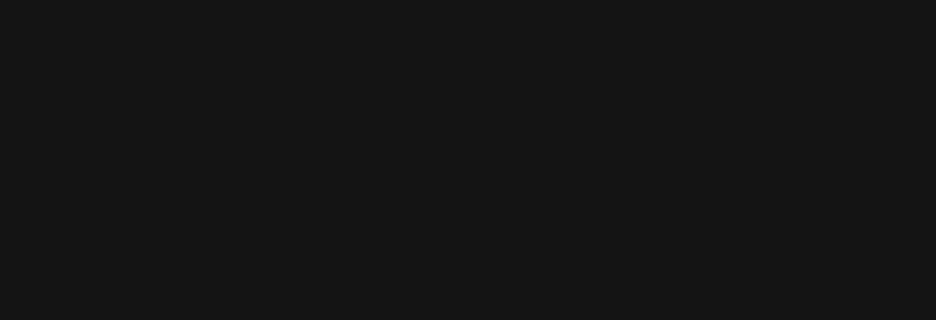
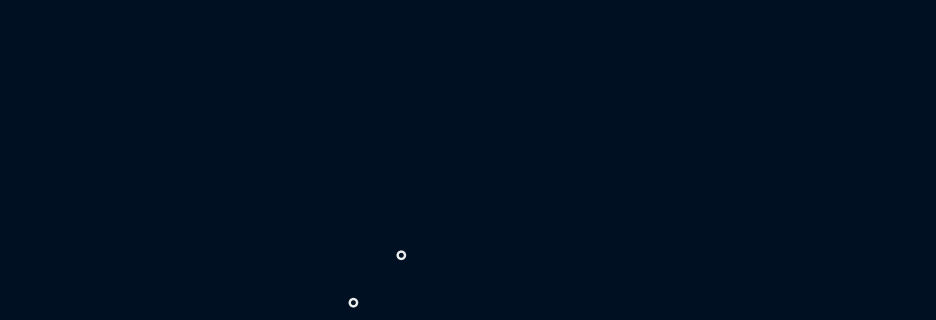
via: none -> (401, 255)
via: none -> (353, 302)

